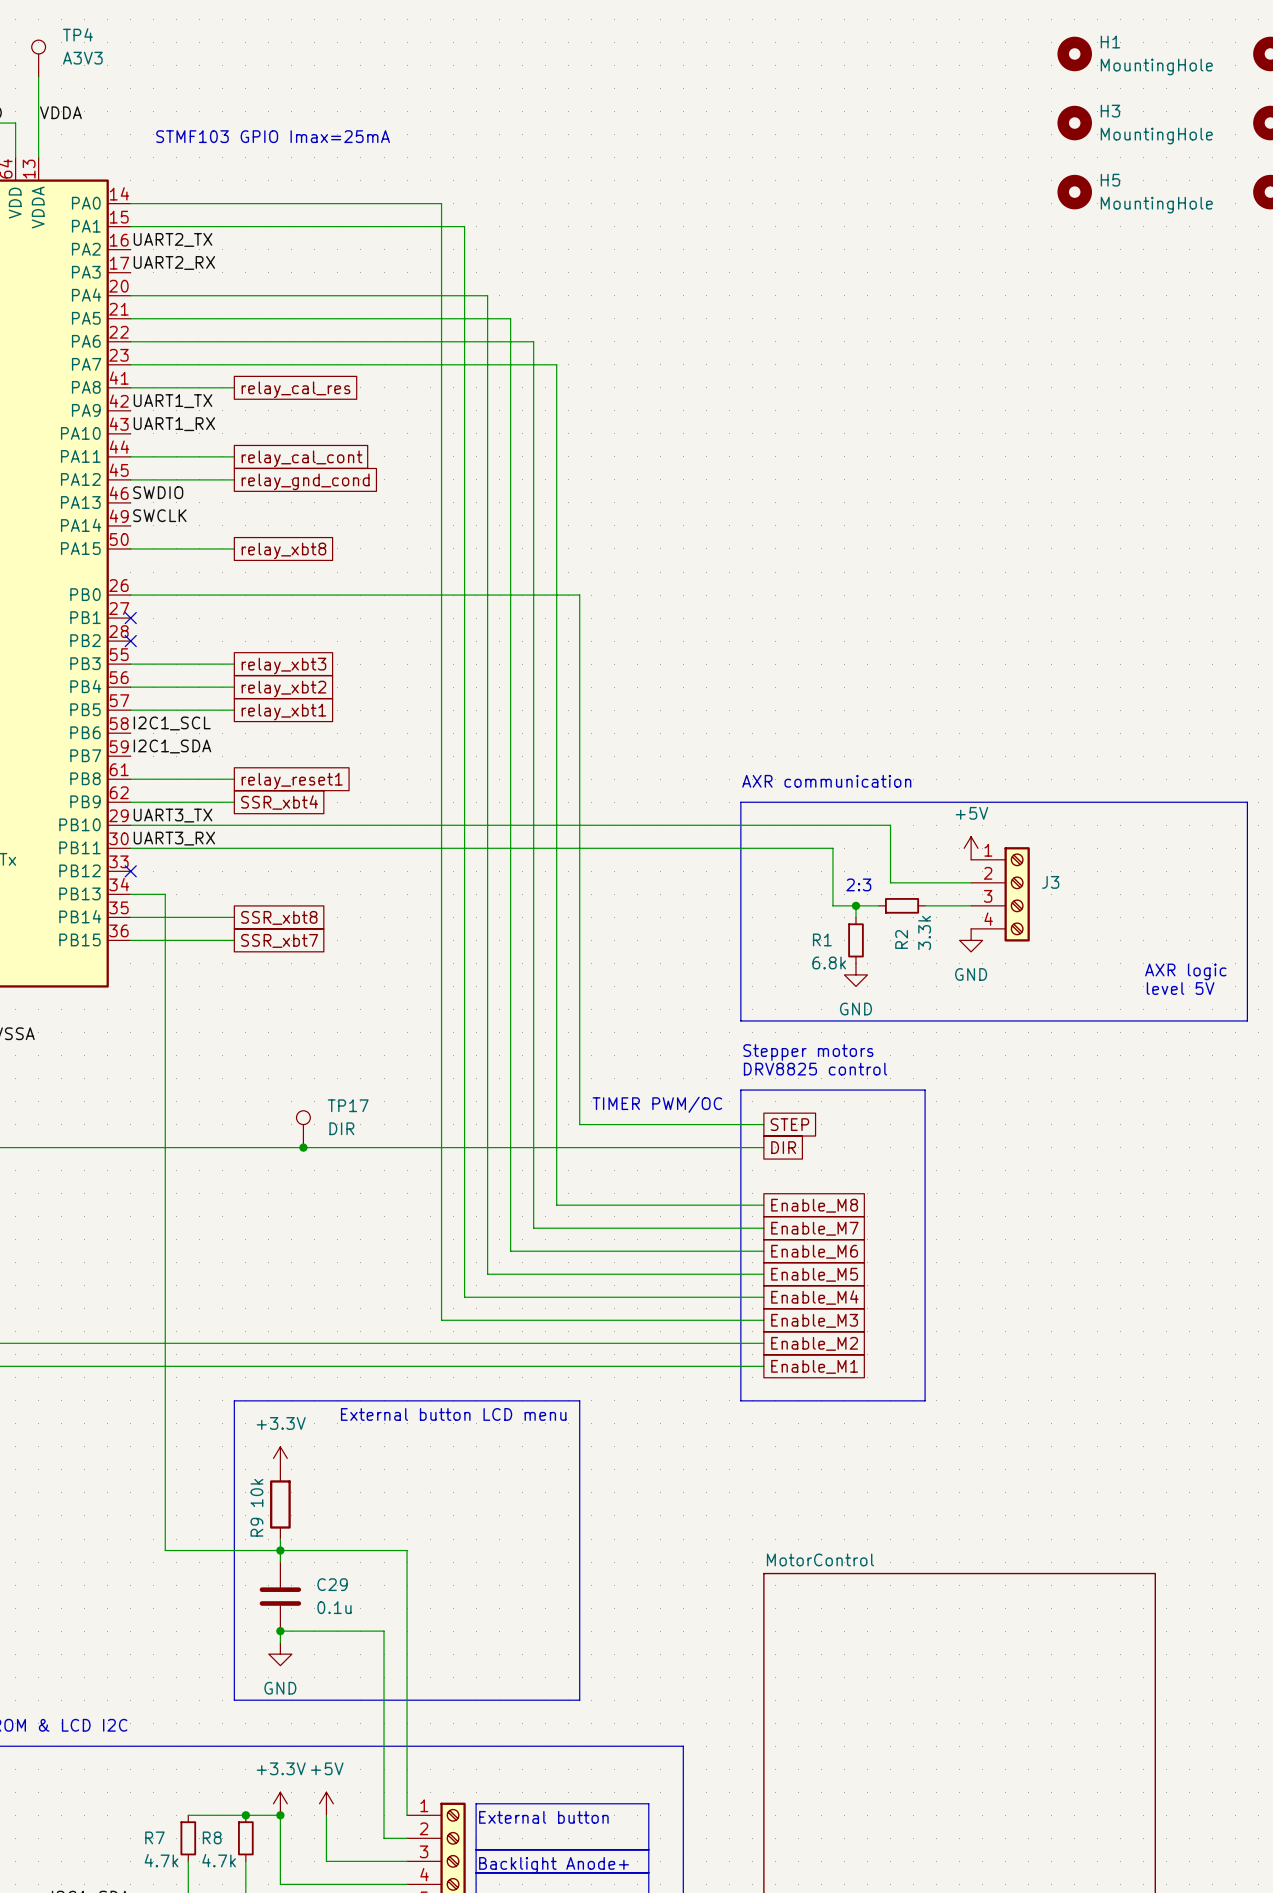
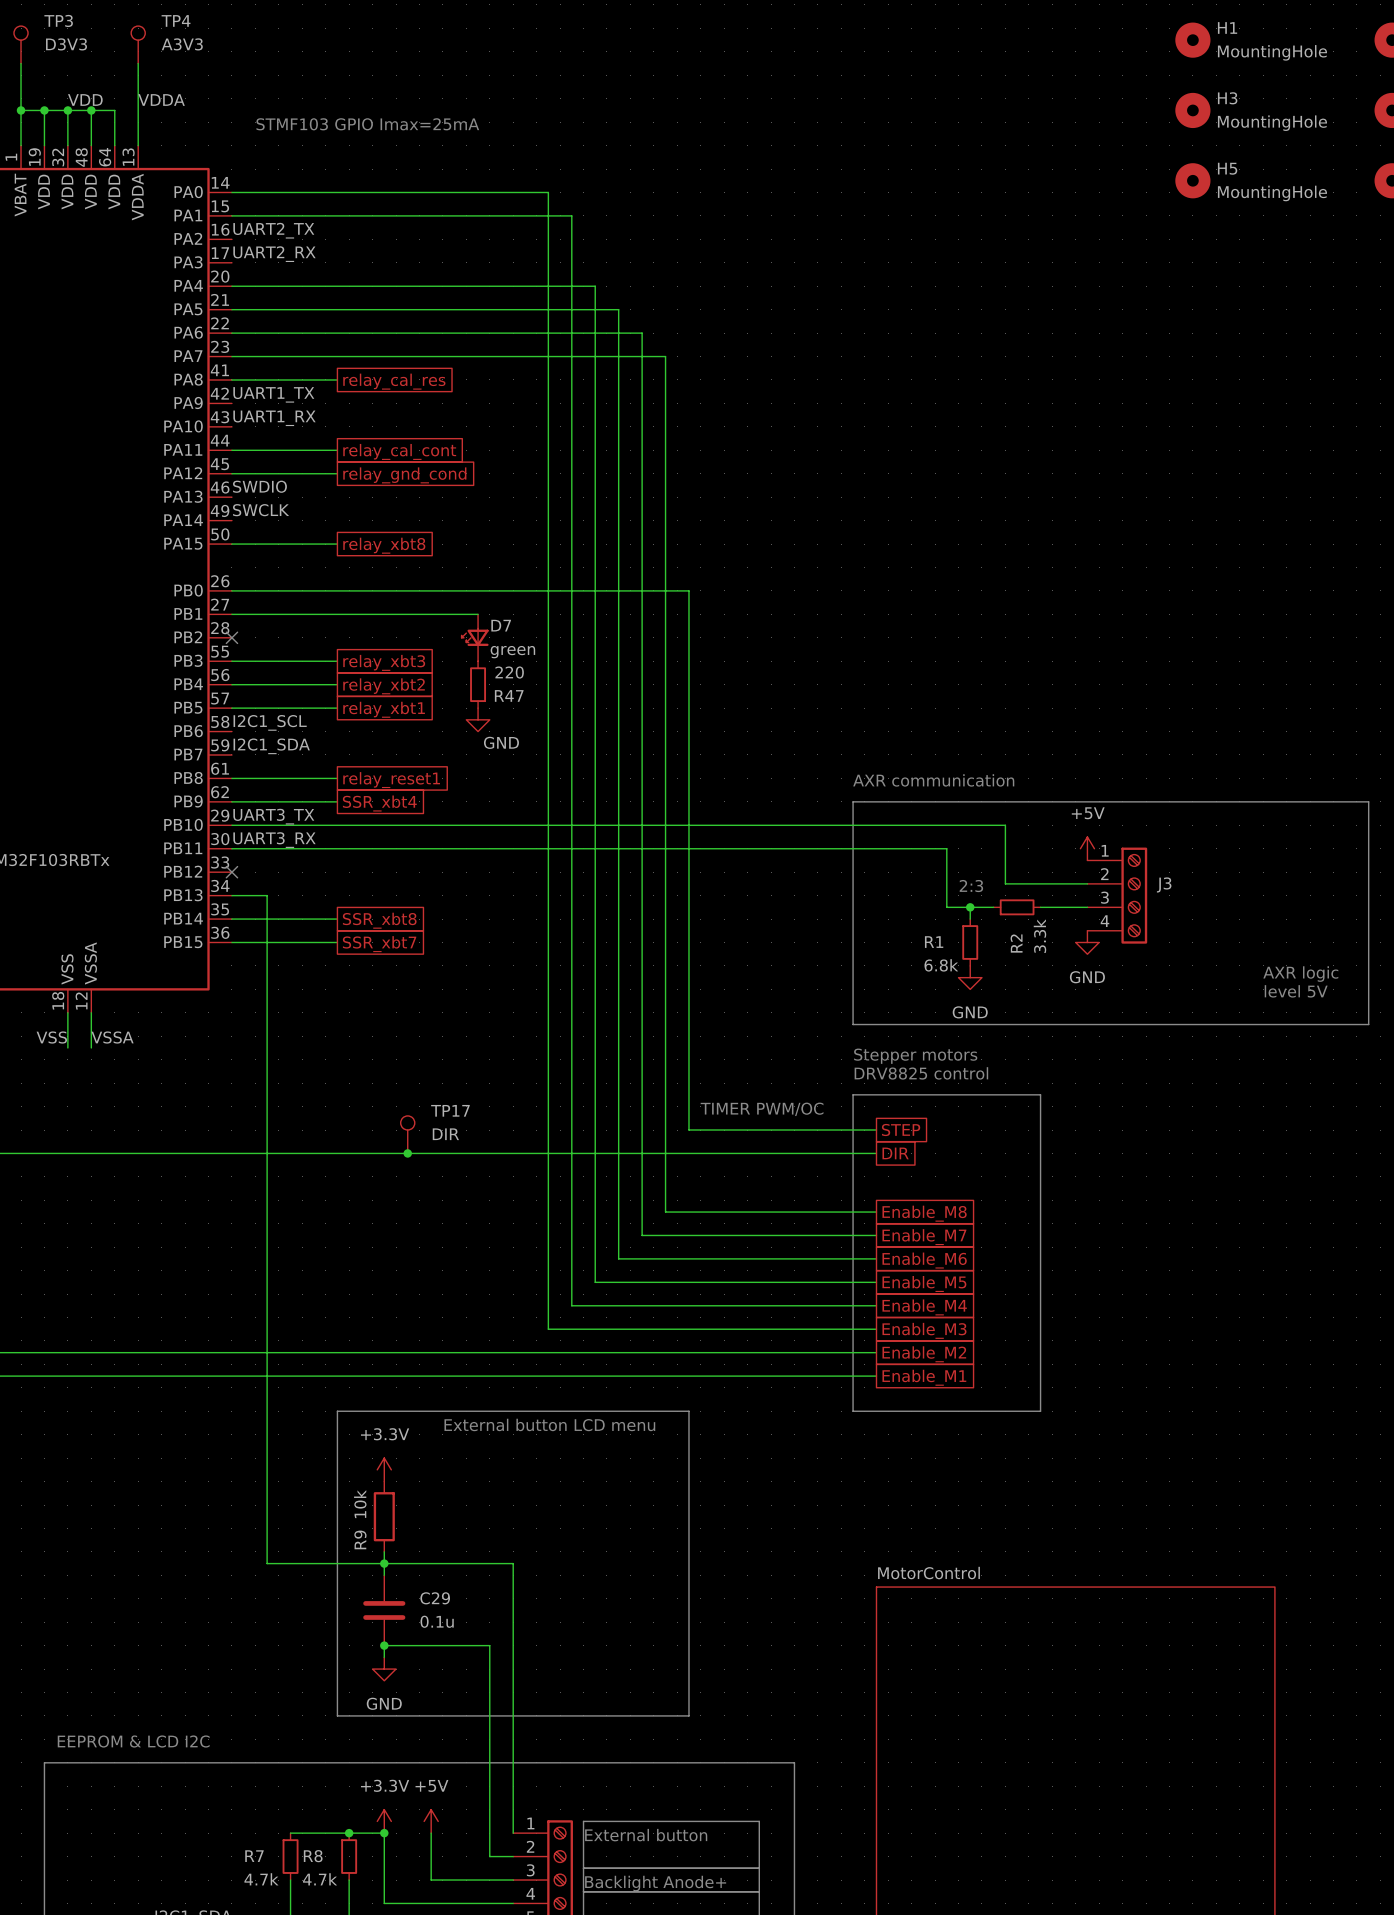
wire: none -> (231, 614) (478, 614)
no-connect mark: (130, 618) -> none
D7: none -> green (475, 637)
R47: none -> 220 (478, 684)
power symbol: none -> GND (478, 719)

